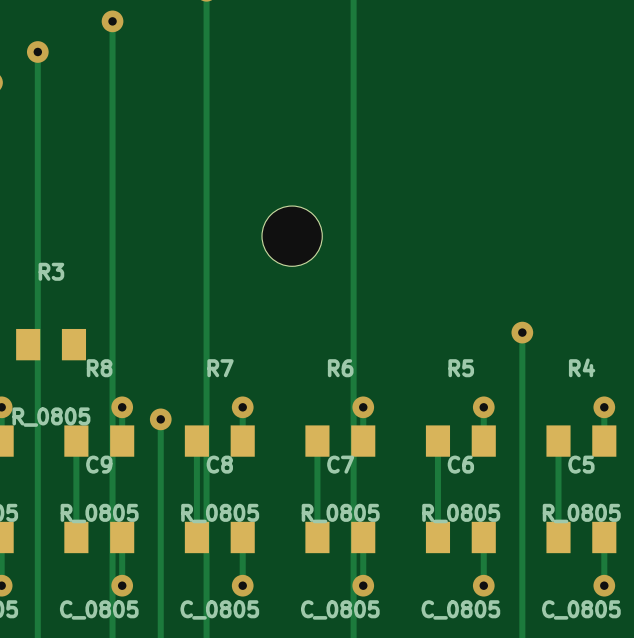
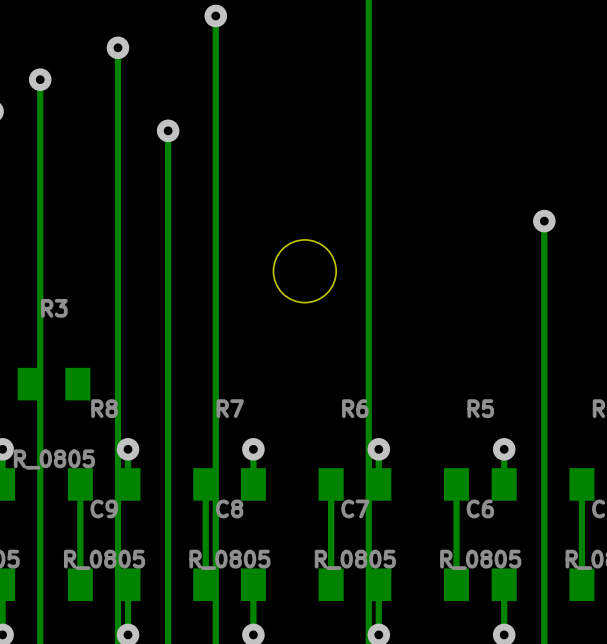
track: none -> (168, 130) (168, 461)
via: none -> (168, 130)
track: none -> (544, 221) (544, 371)
via position: (522, 332) -> (544, 221)
via: (160, 419) -> none

